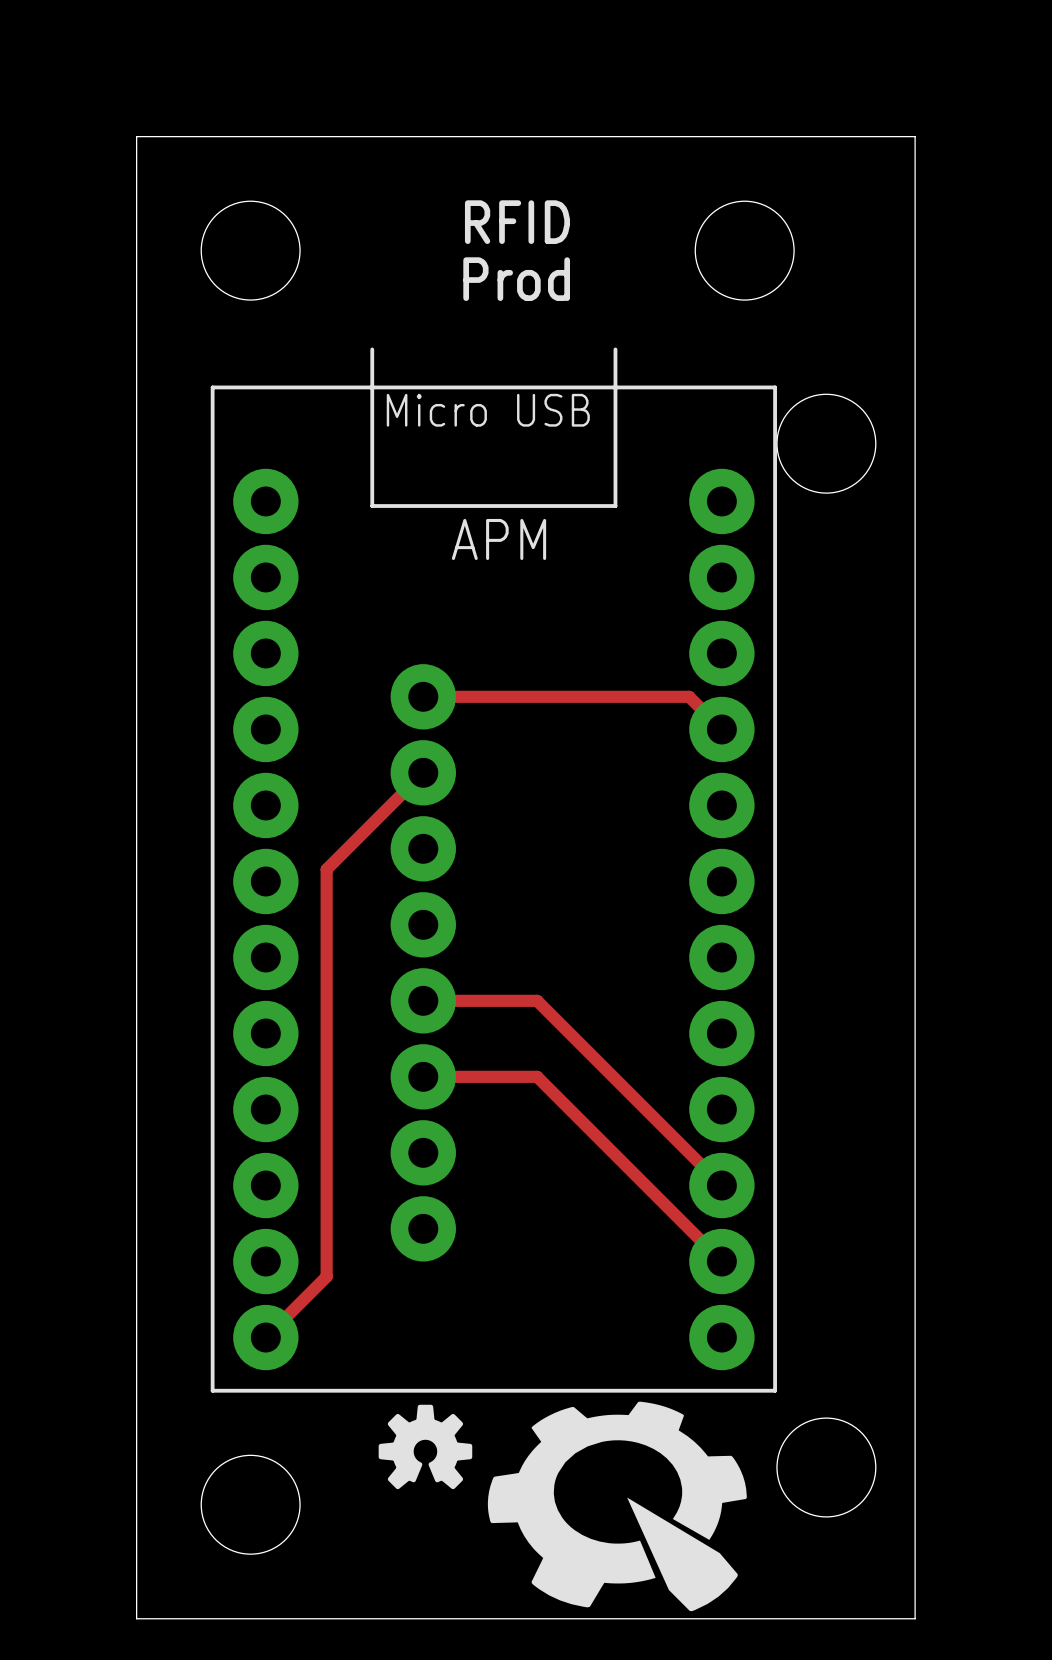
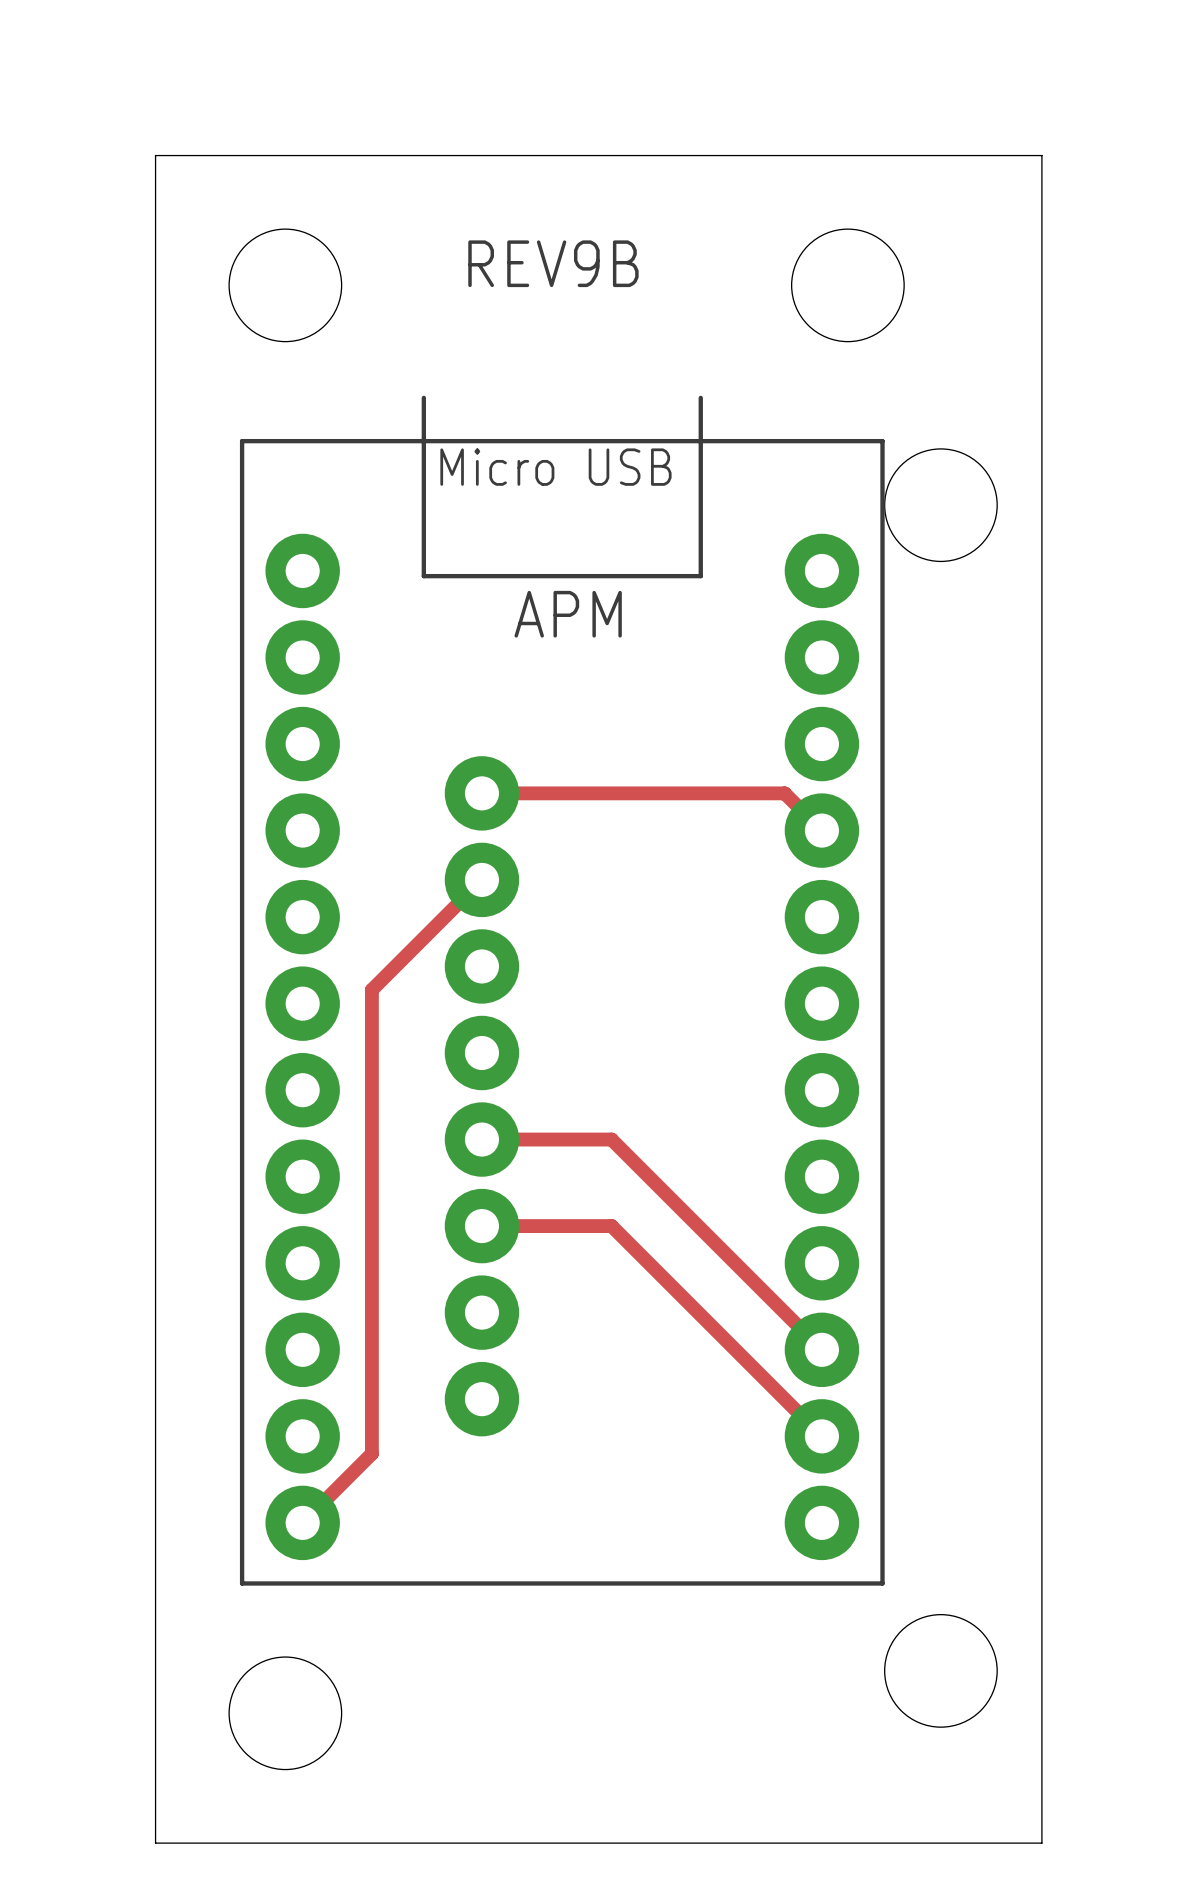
text: RFID (517, 222) -> none
text: none -> REV9B (553, 263)
text: Prod (516, 279) -> none
drawing: [378, 1401, 747, 1612] -> none

